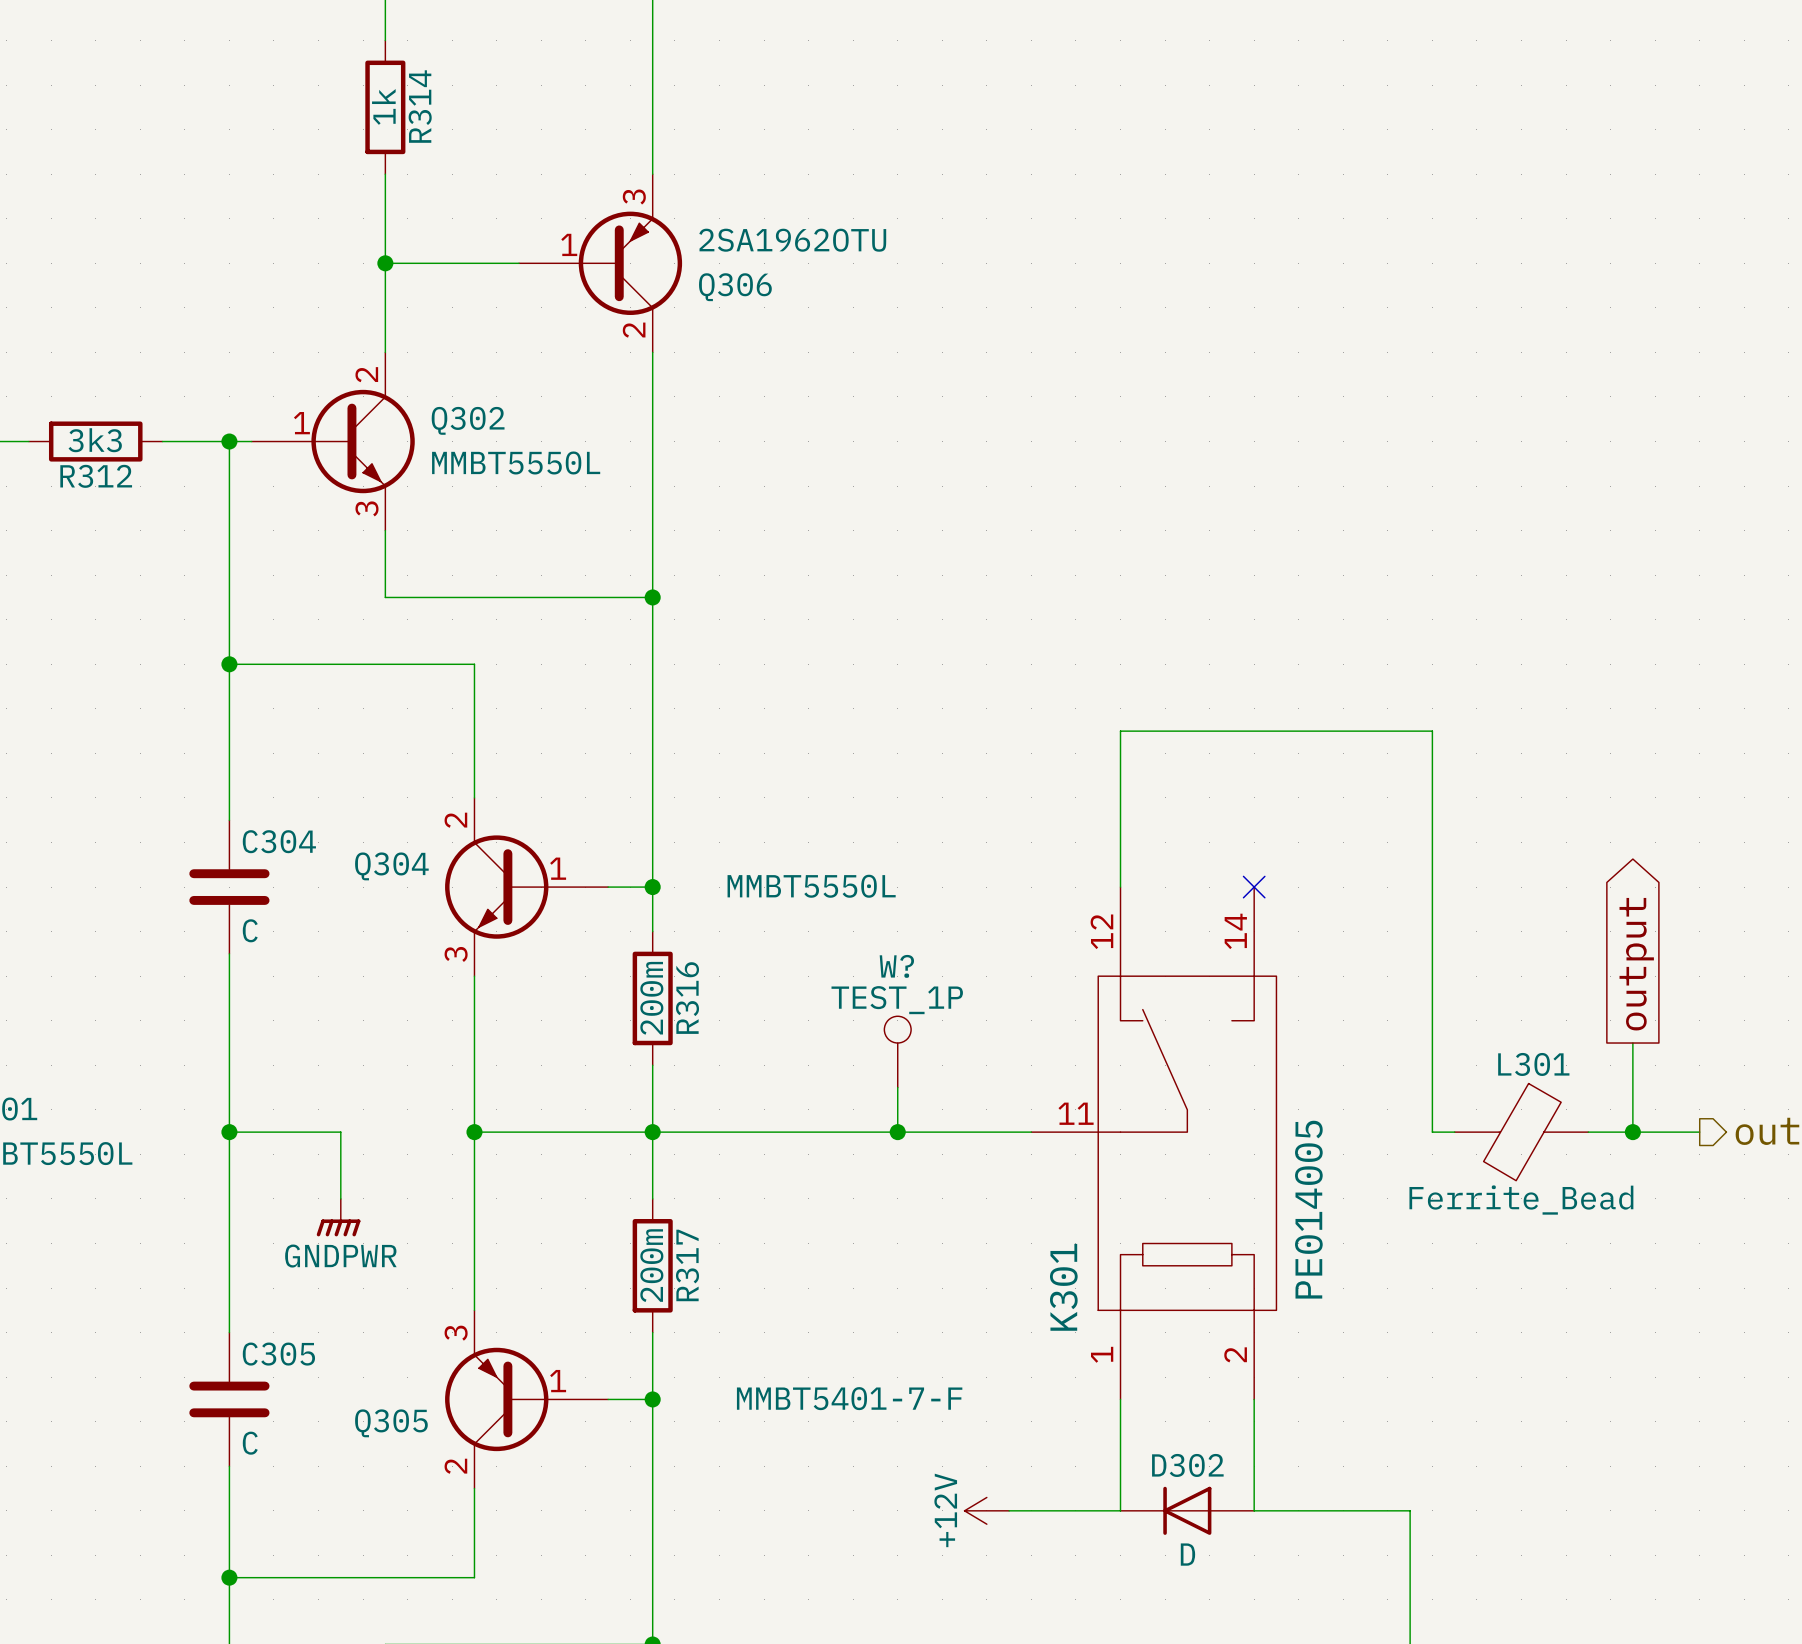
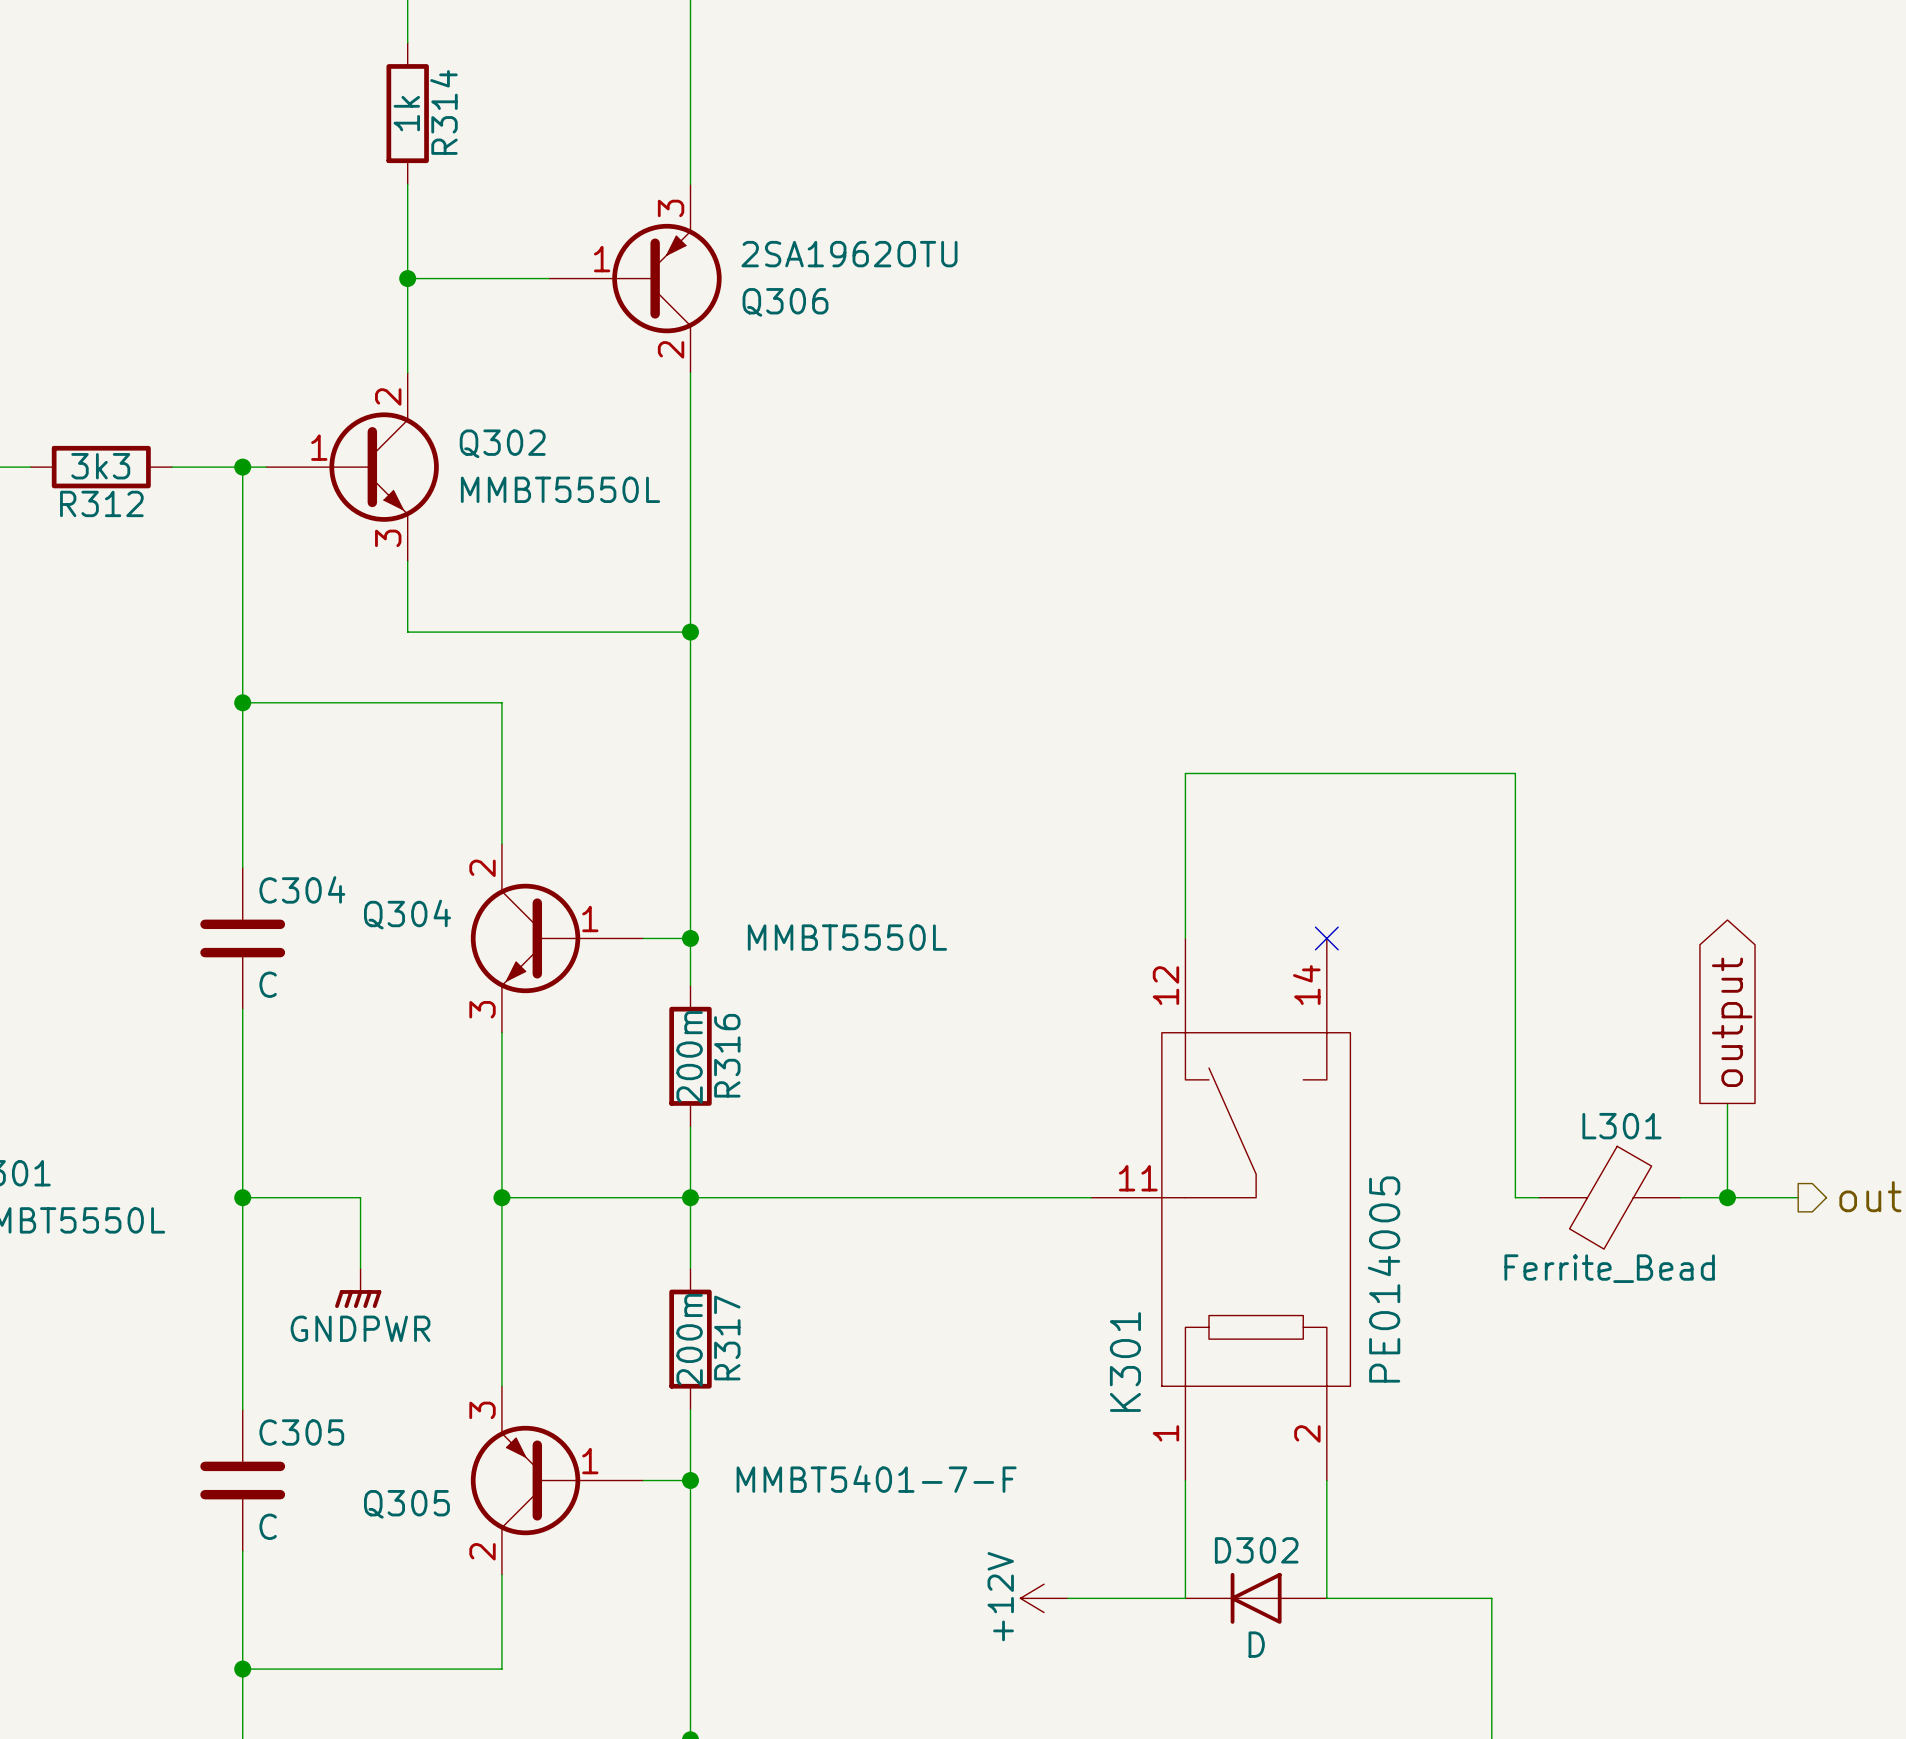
W?: TEST_1P (897, 1051) -> none
wire: (897, 1087) (897, 1132) -> none
junction: (897, 1132) -> none

